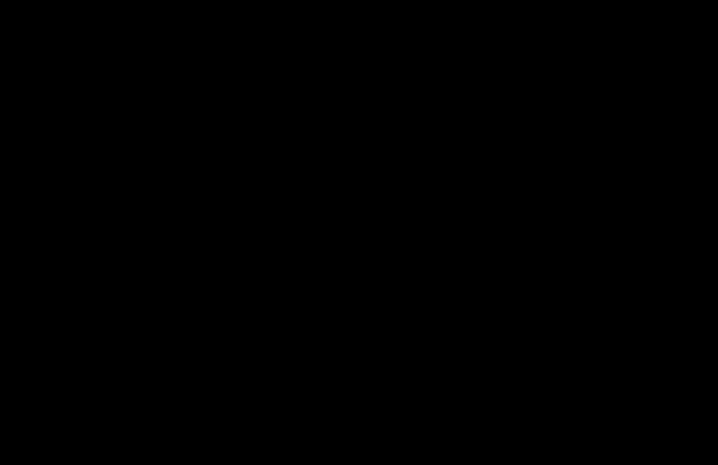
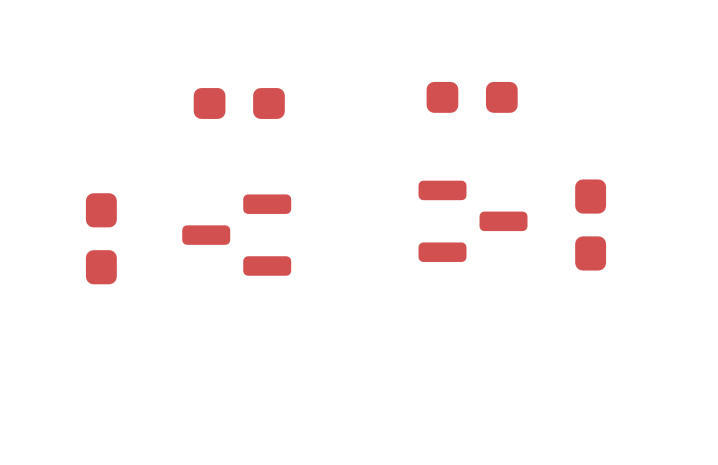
part: none -> (472, 97)
part: none -> (239, 103)
part: none -> (473, 221)
part: none -> (590, 224)
part: none -> (236, 235)
part: none -> (101, 238)

